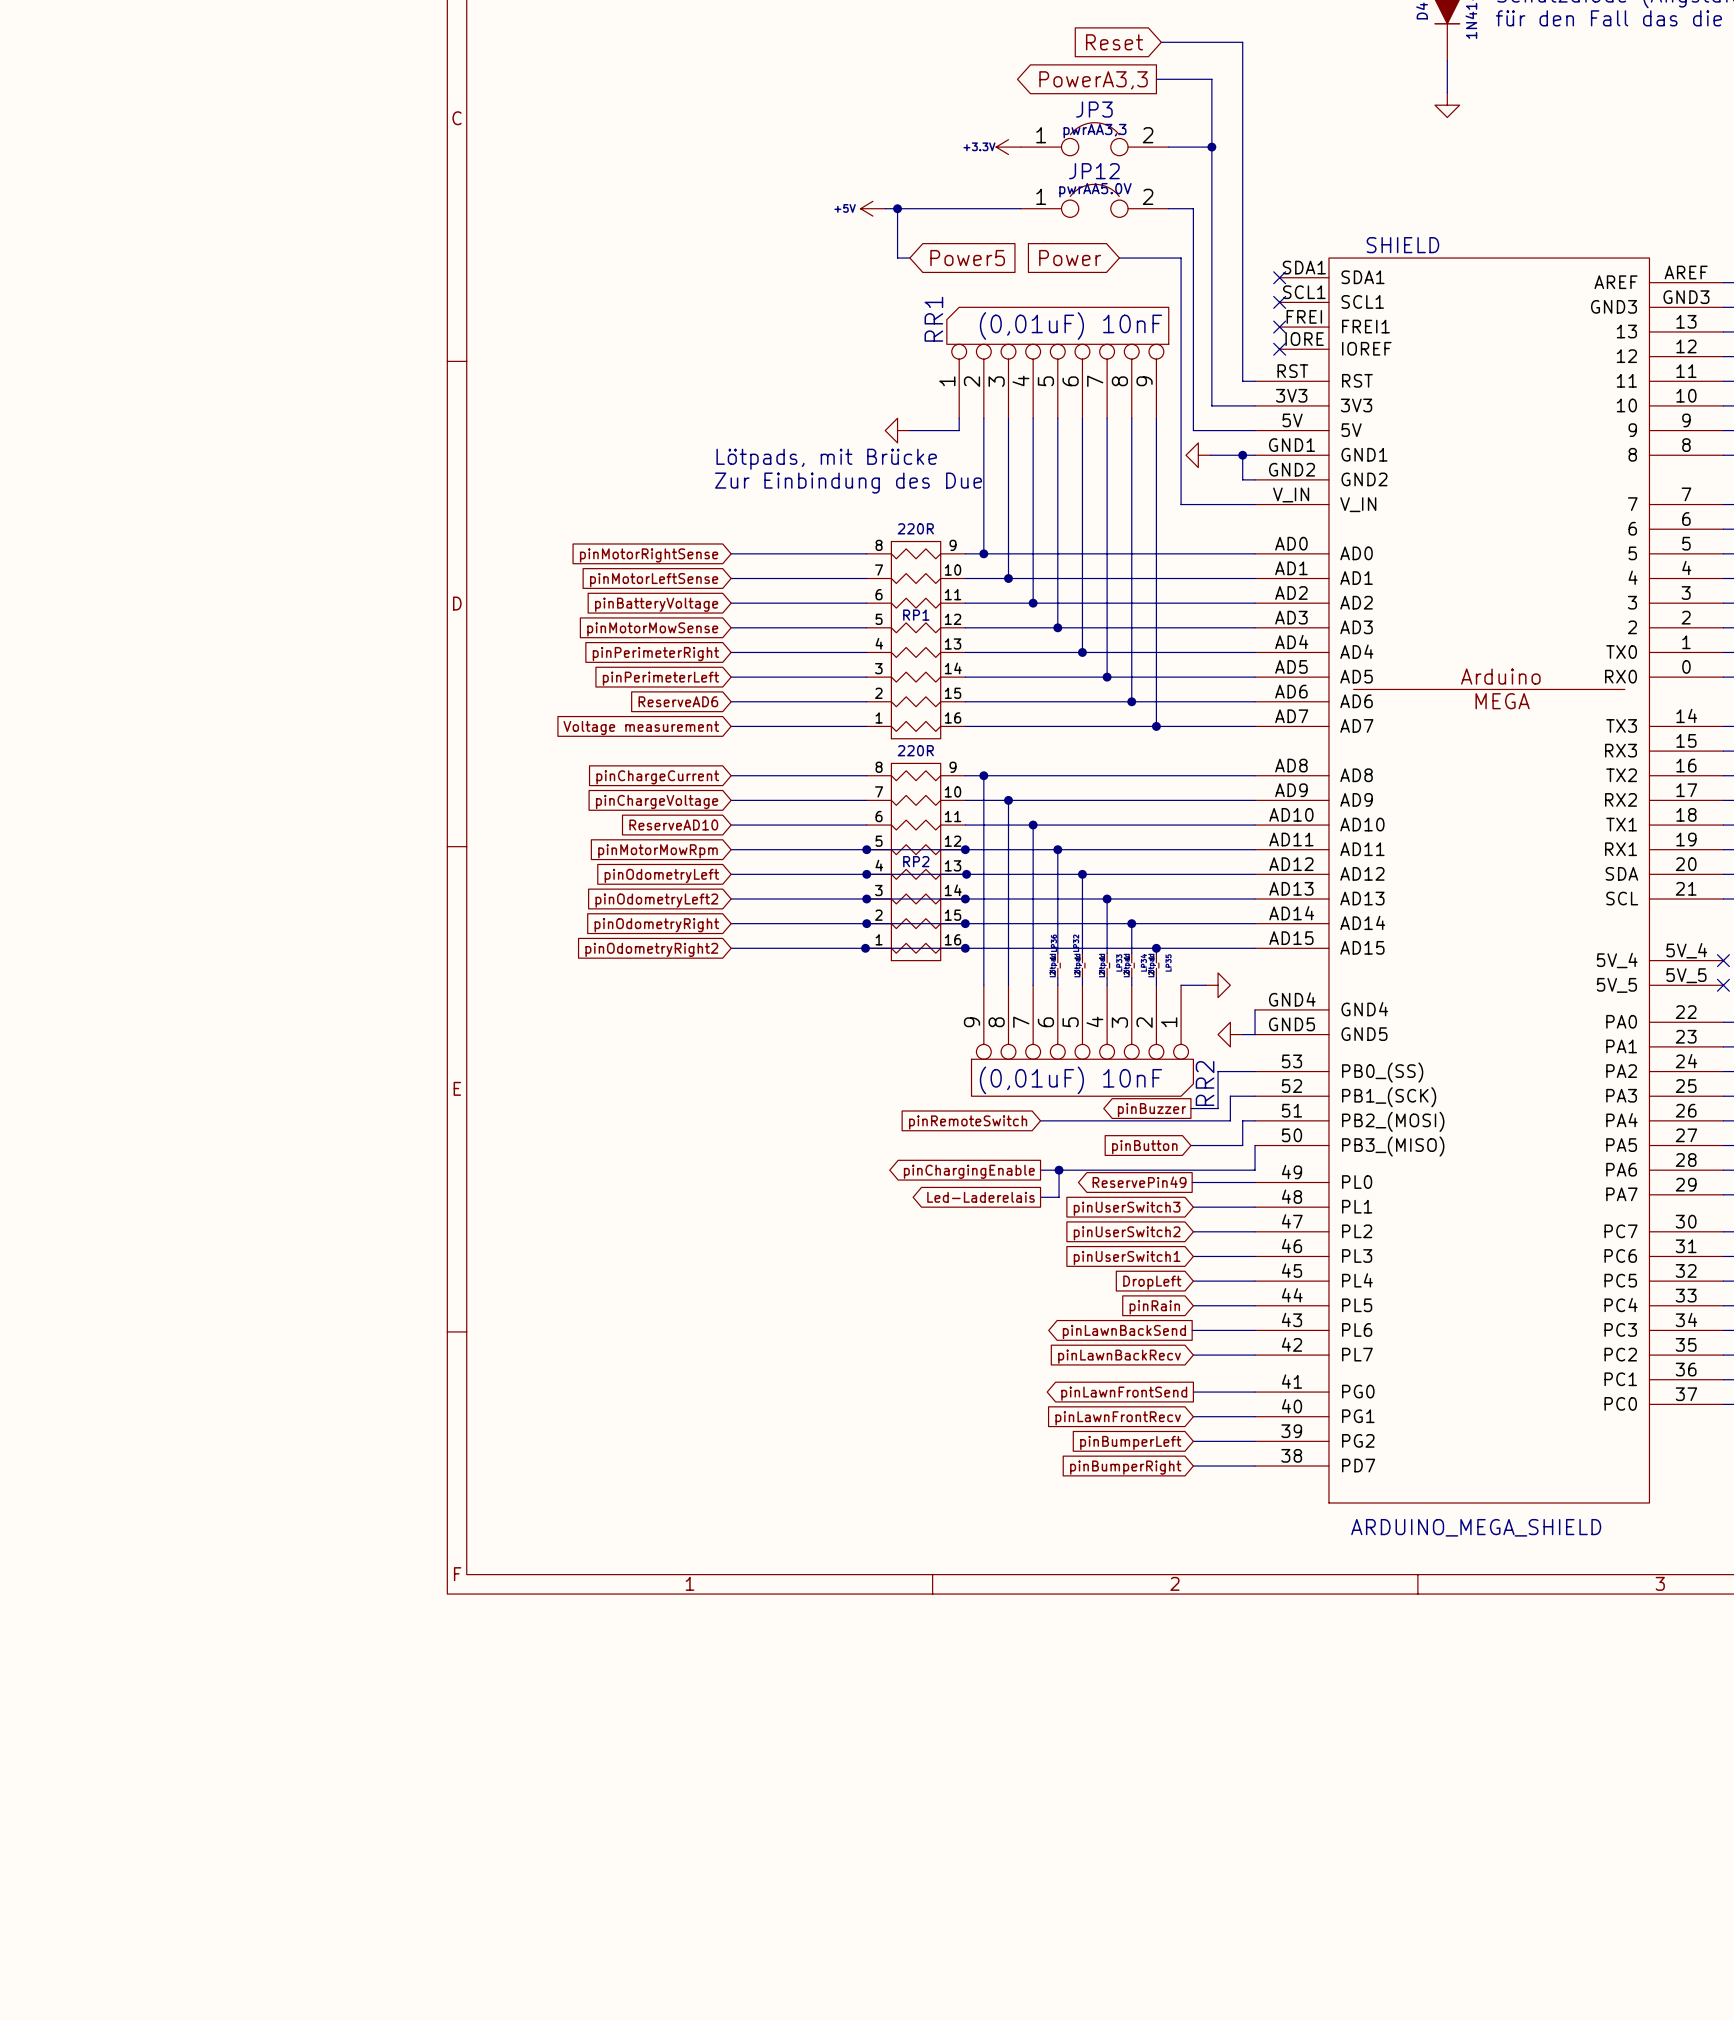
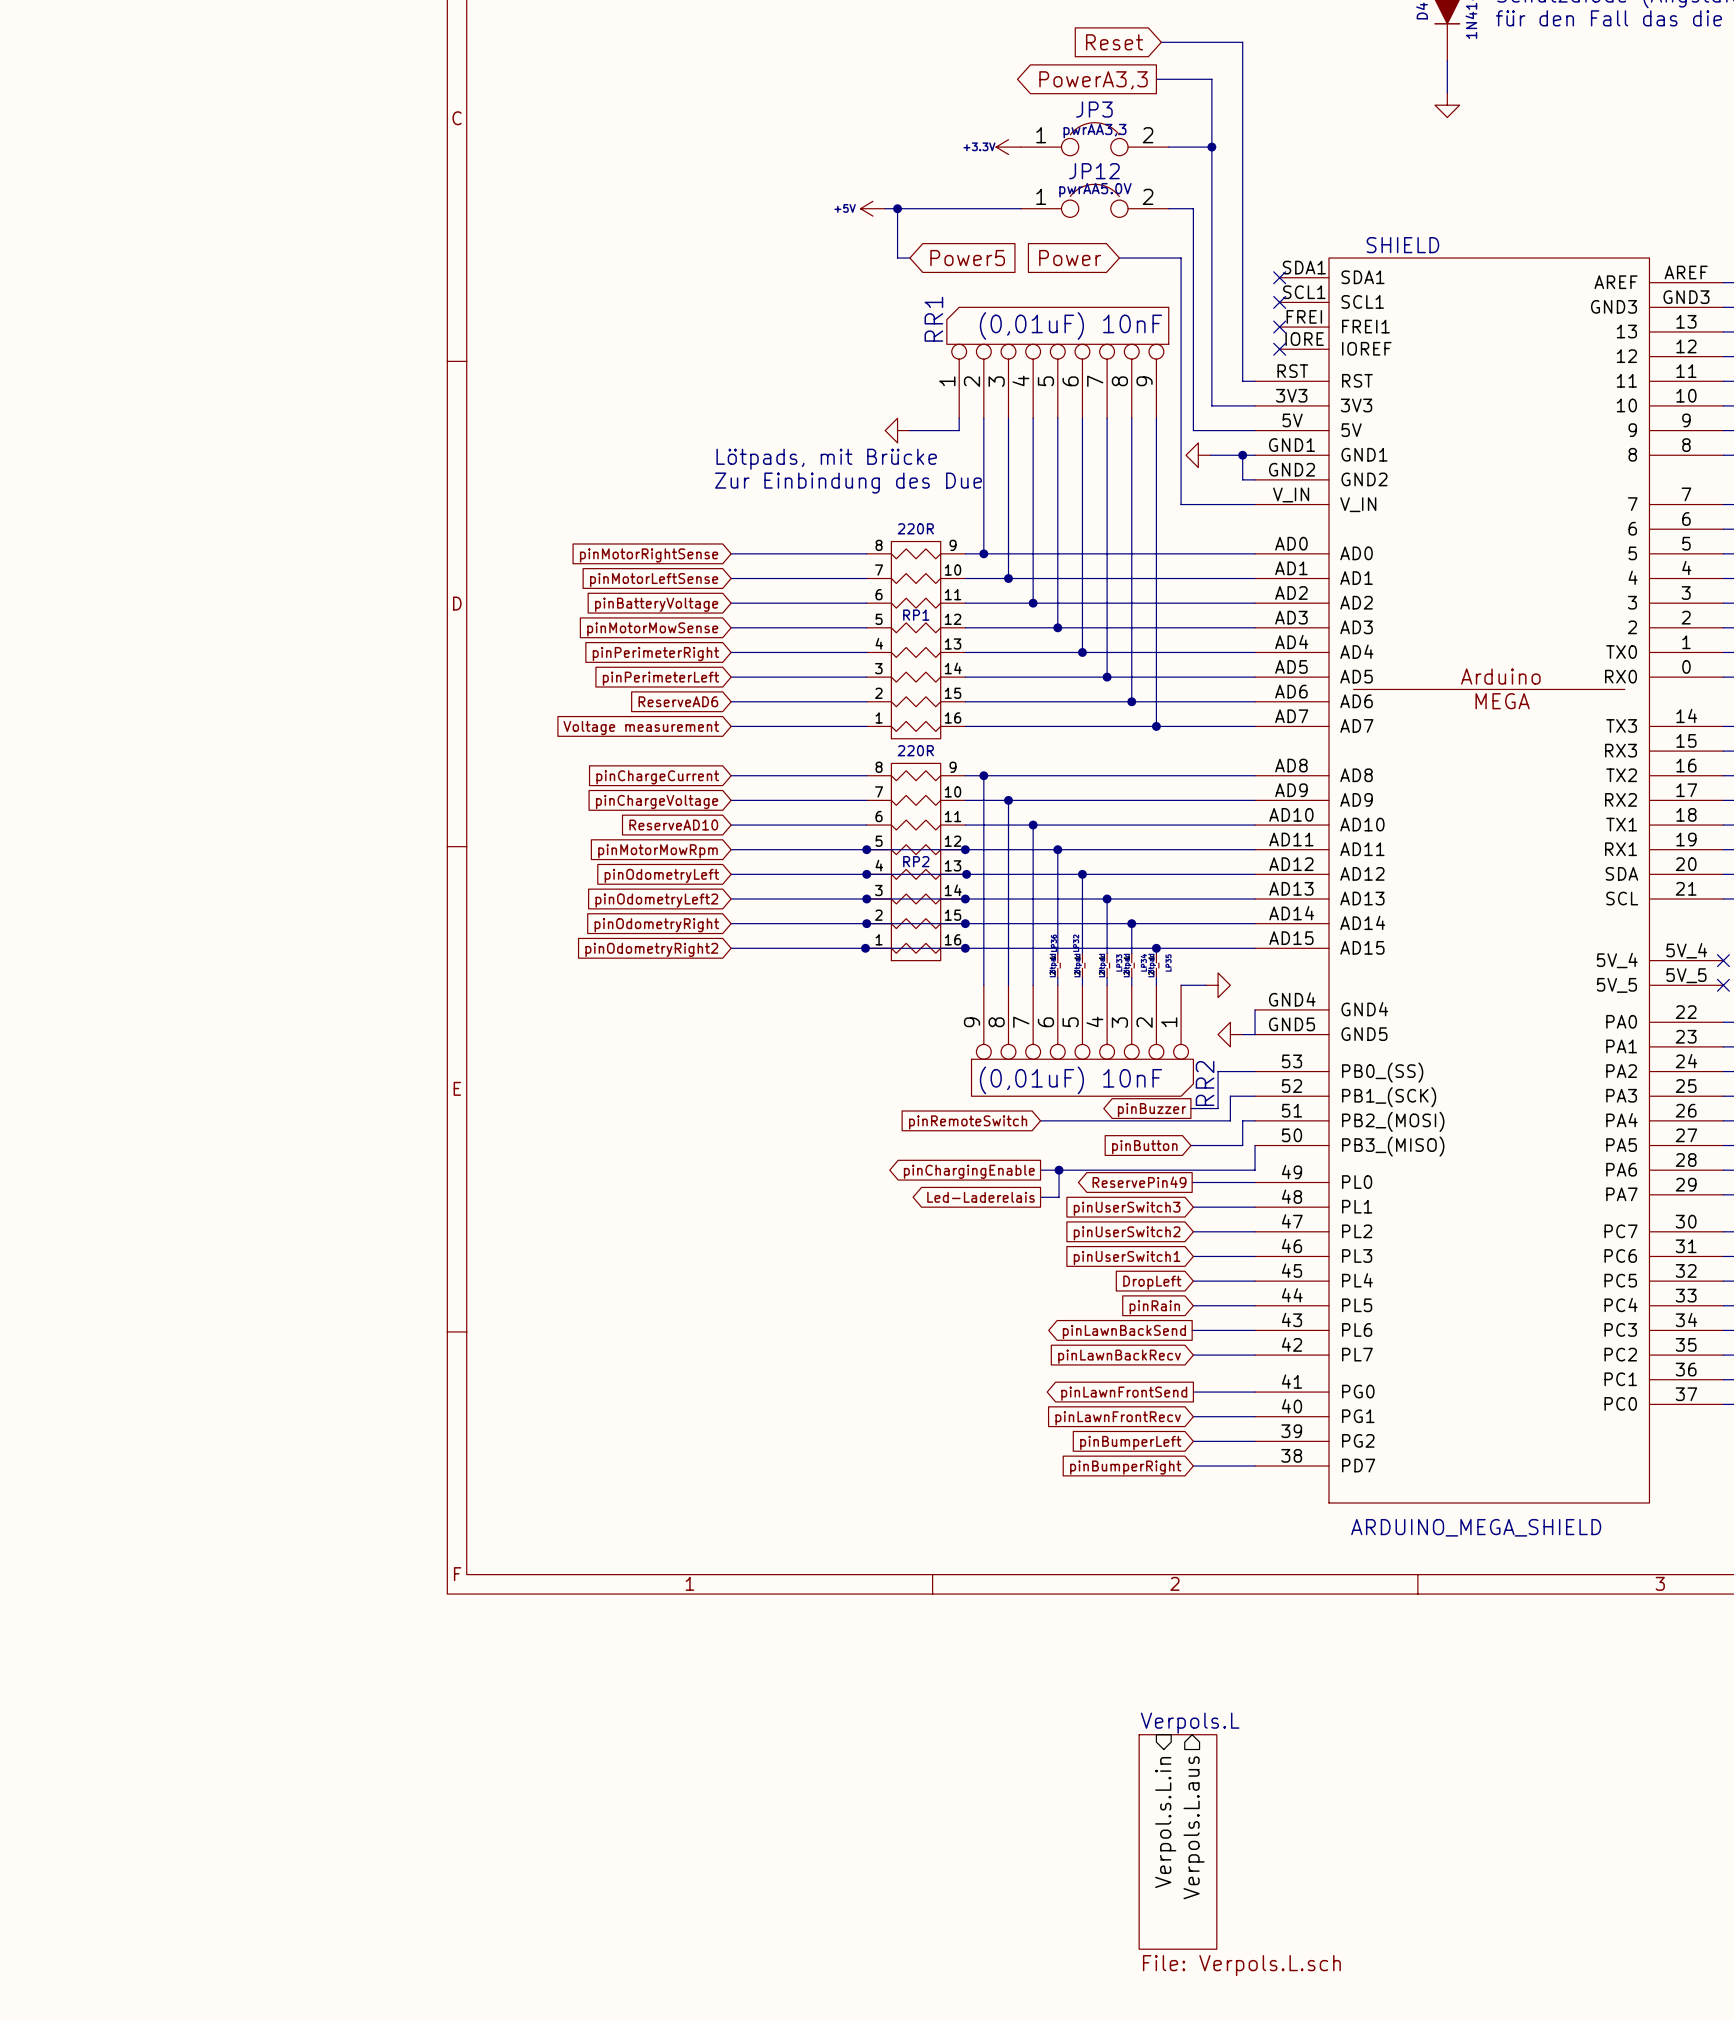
sheet pin: none -> Verpol.s.L.in (1165, 1822)
sheet pin: none -> Verpols.L.aus (1194, 1827)
sheet Verpols.L: none -> File: Verpols.L.sch (1177, 1841)

